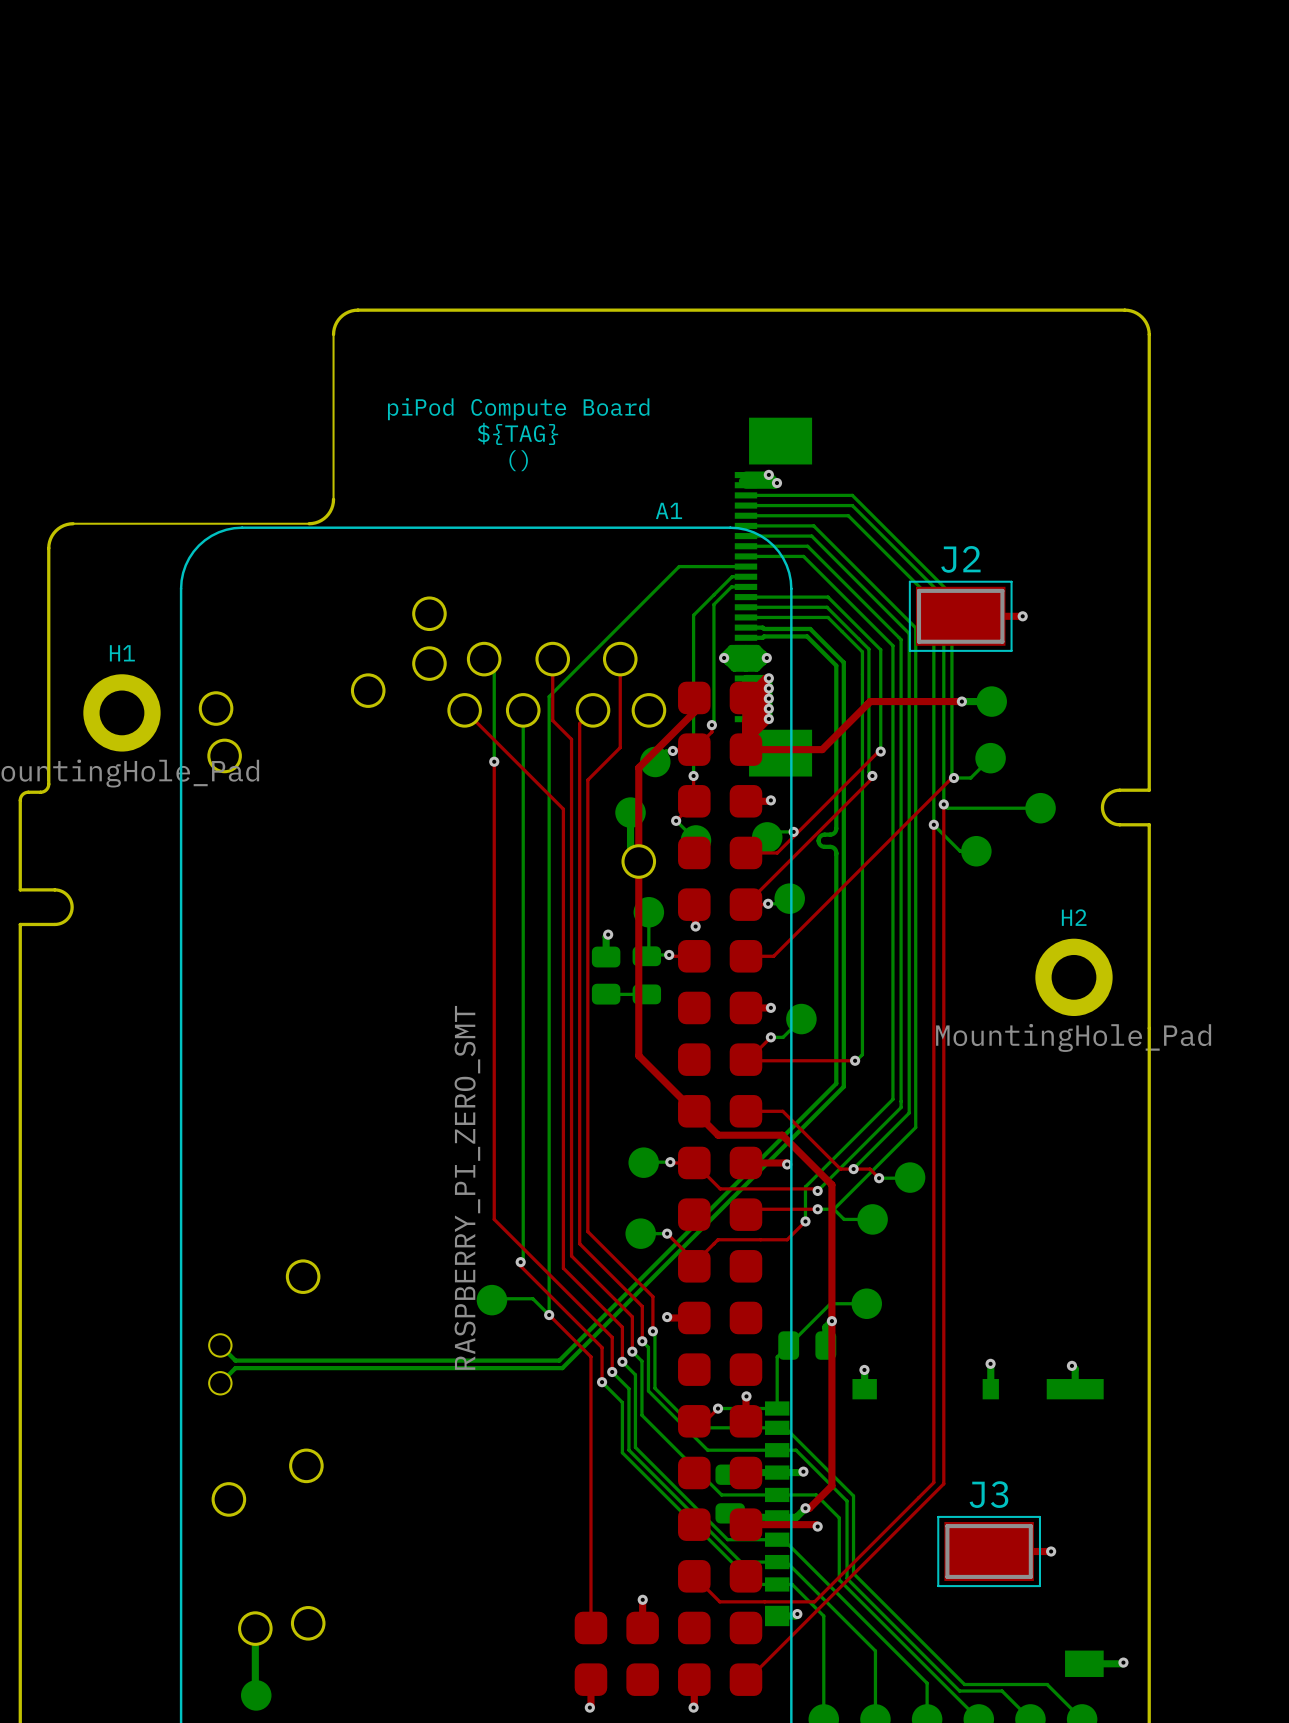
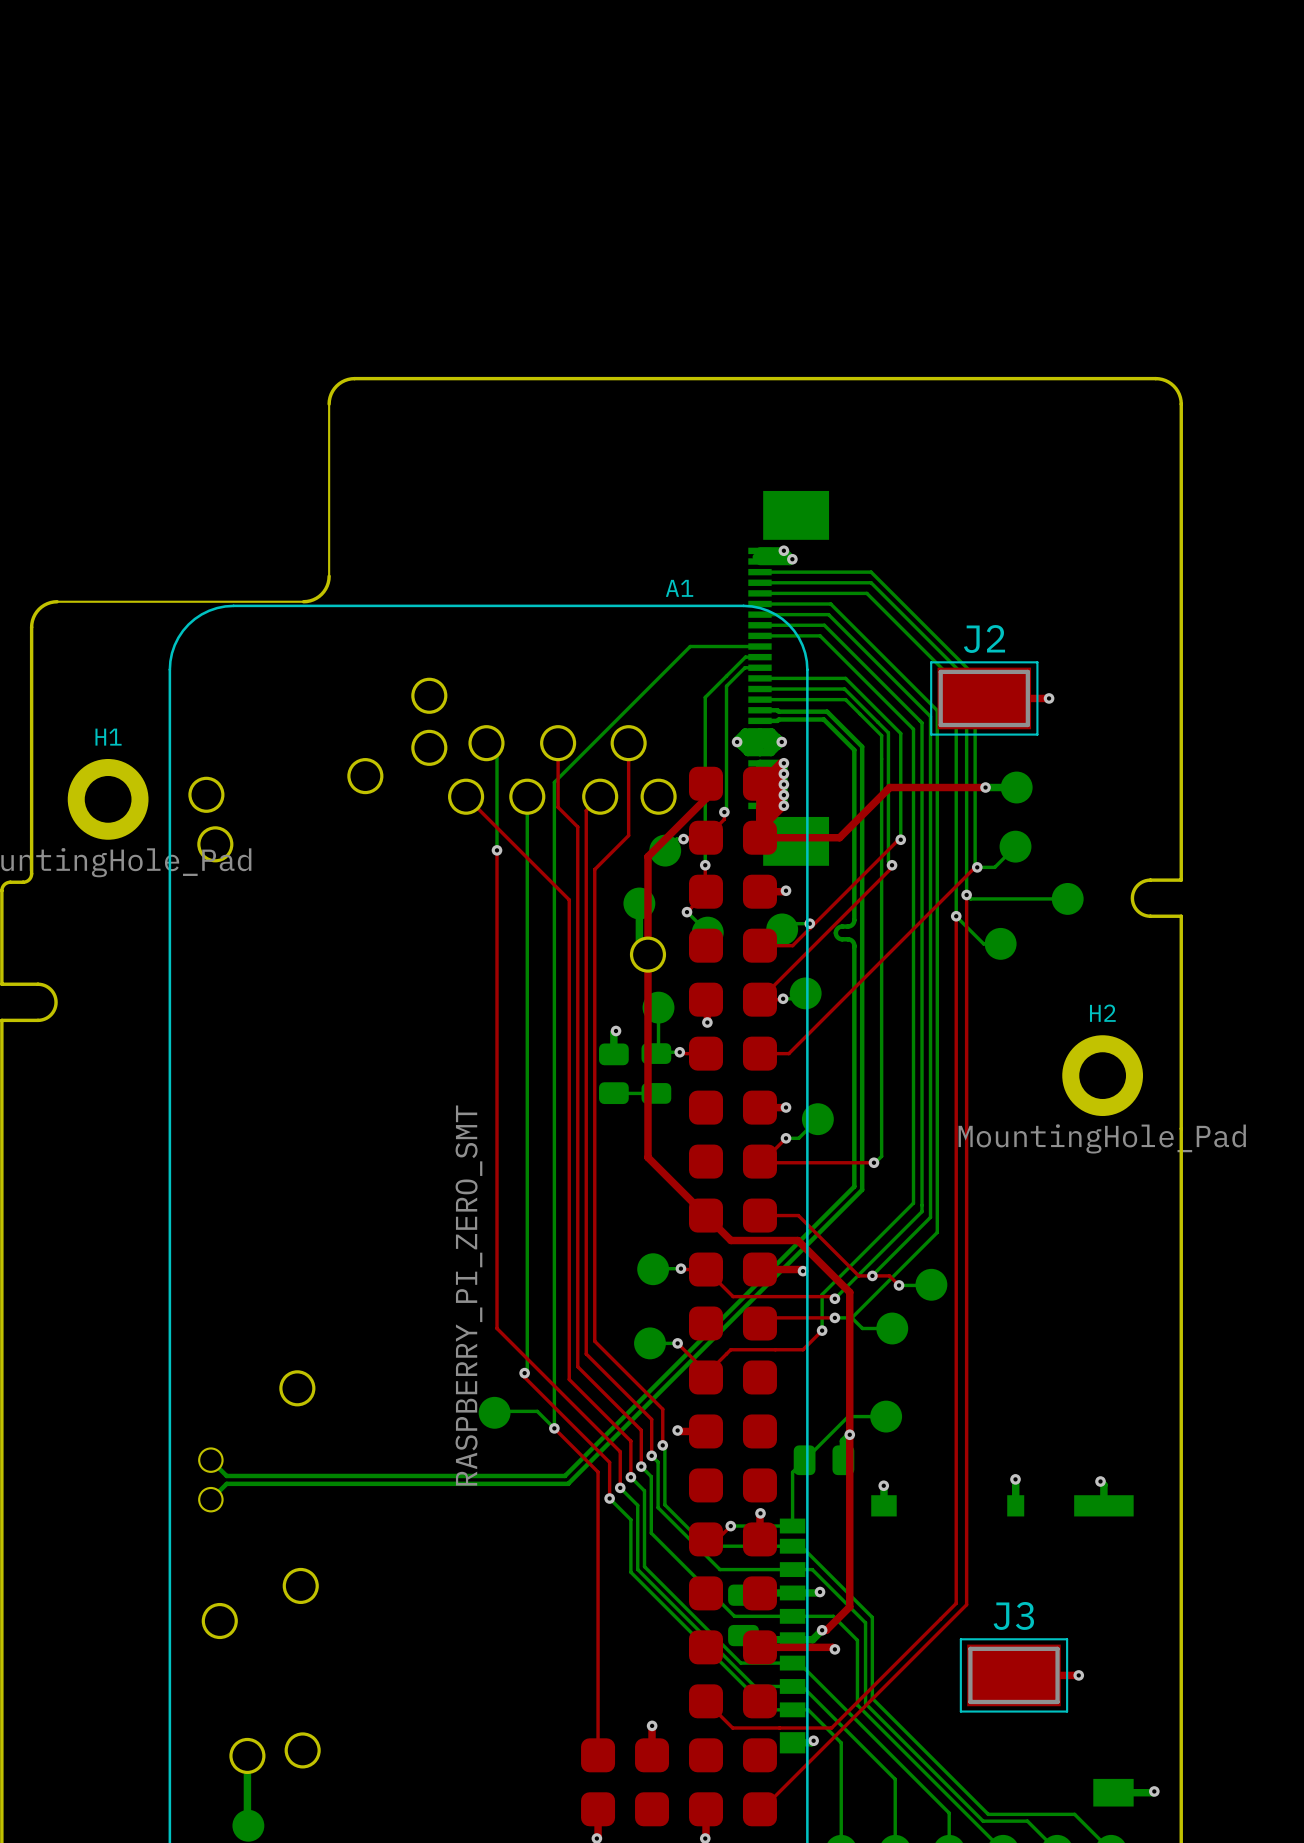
text: piPod Compute Board (518, 409) -> none
text: ${TAG} (518, 433) -> none
text: () (518, 460) -> none

